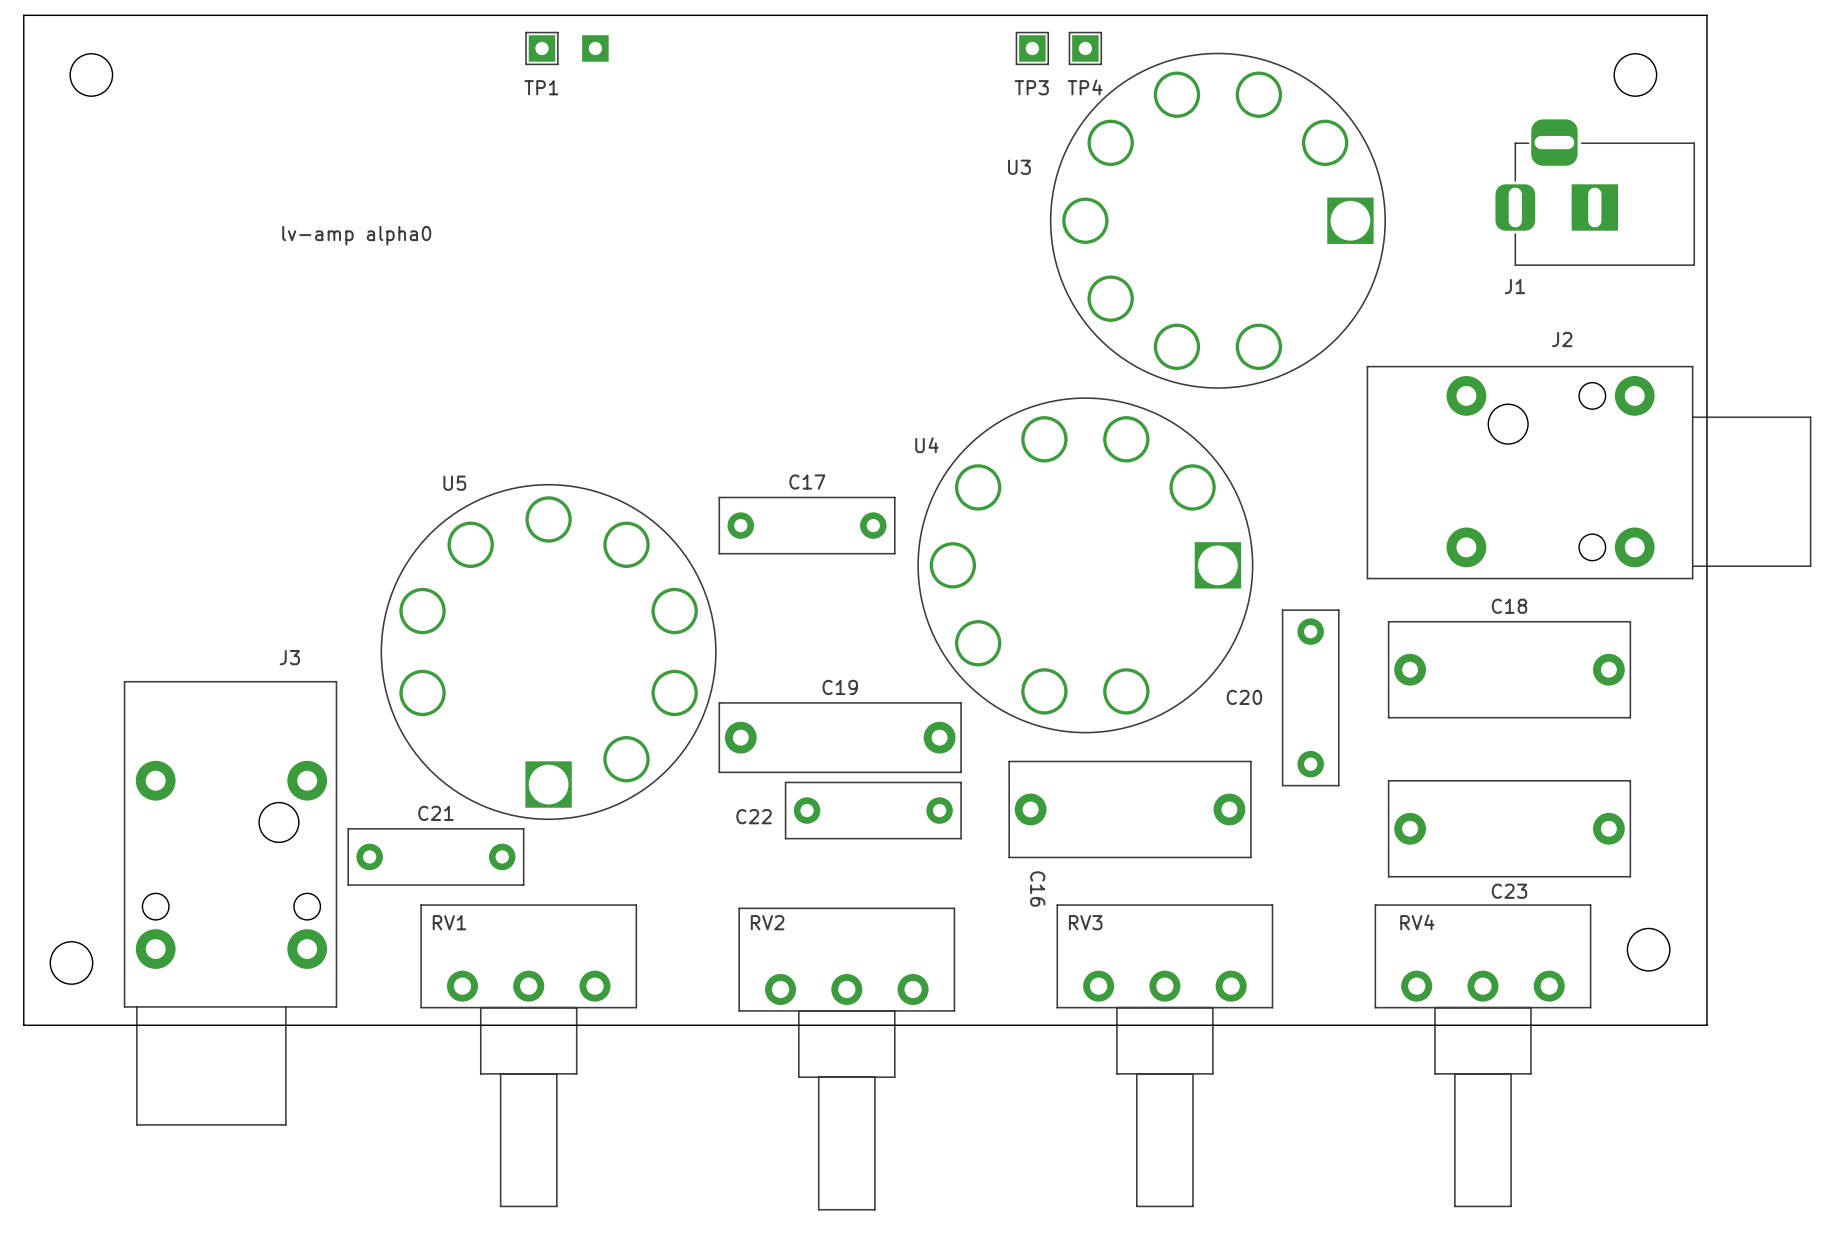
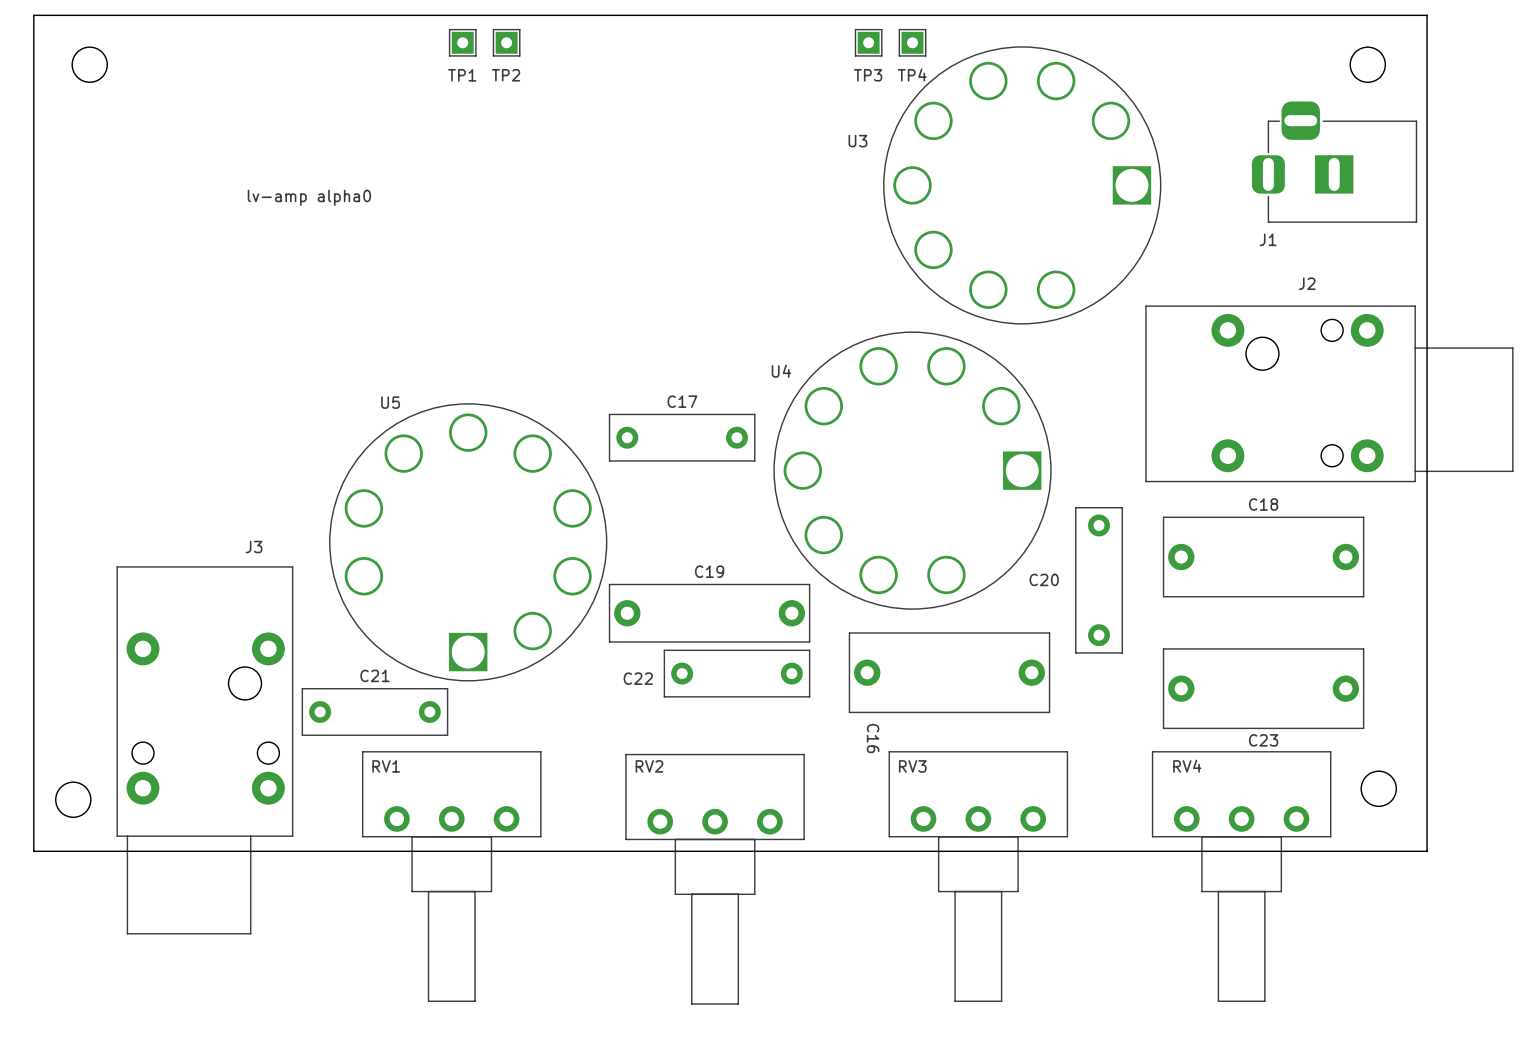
TP2: none -> (506, 42)
part: (595, 48) -> none

